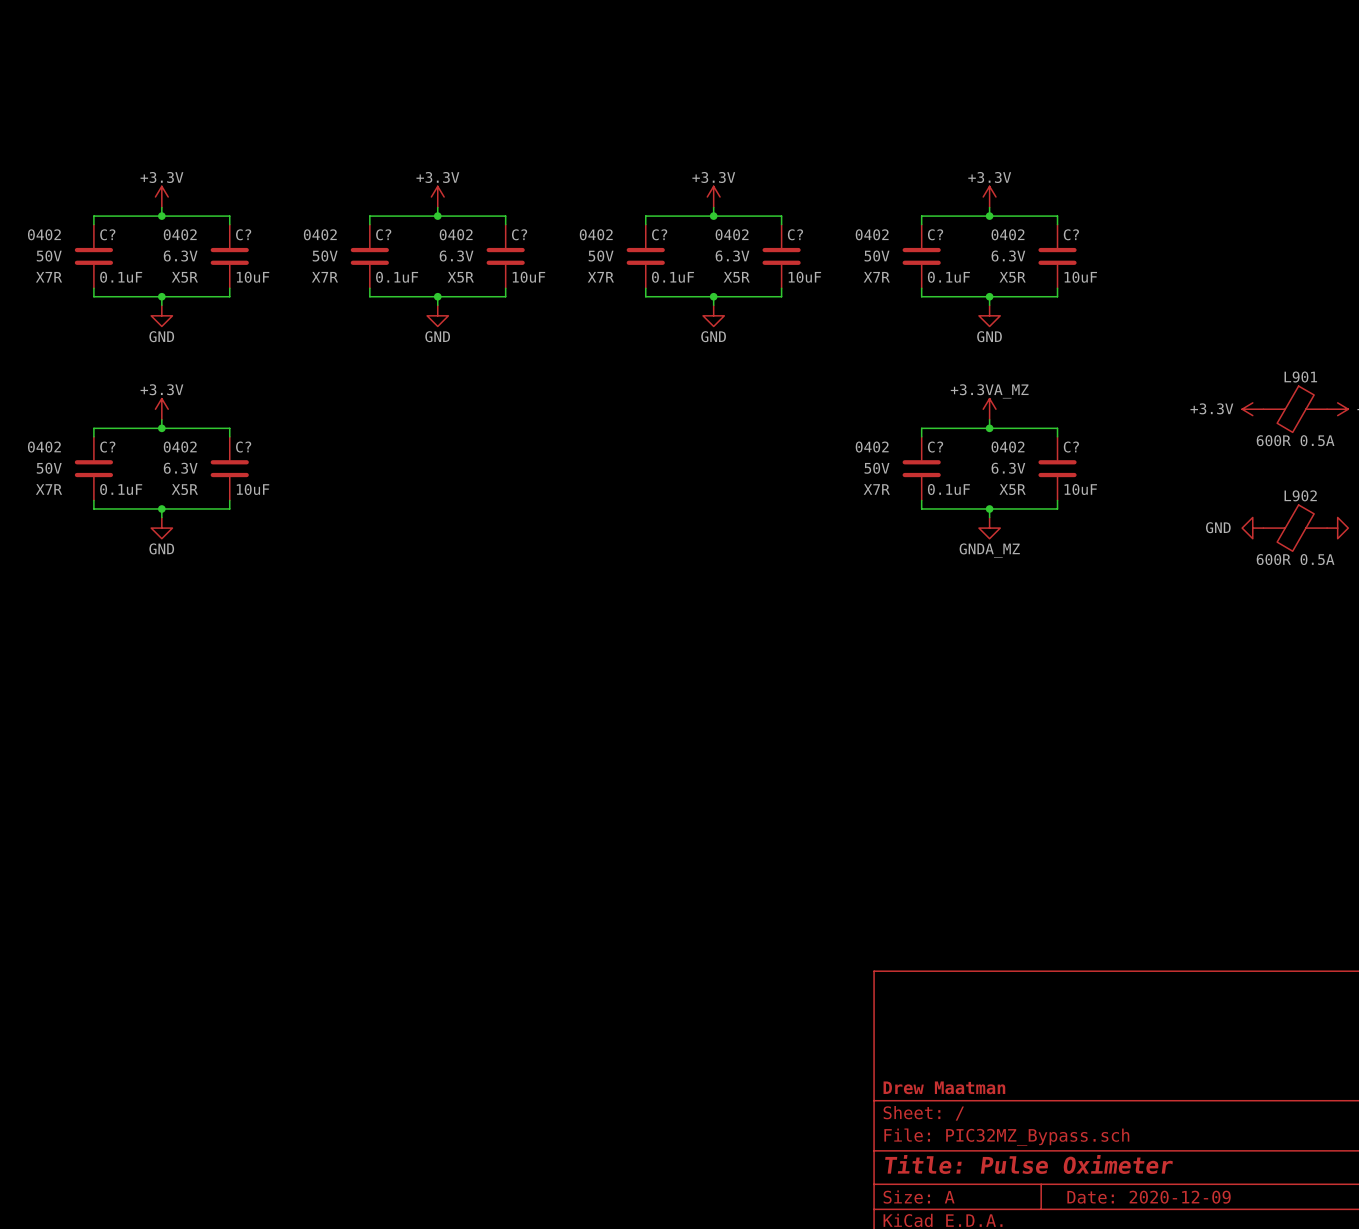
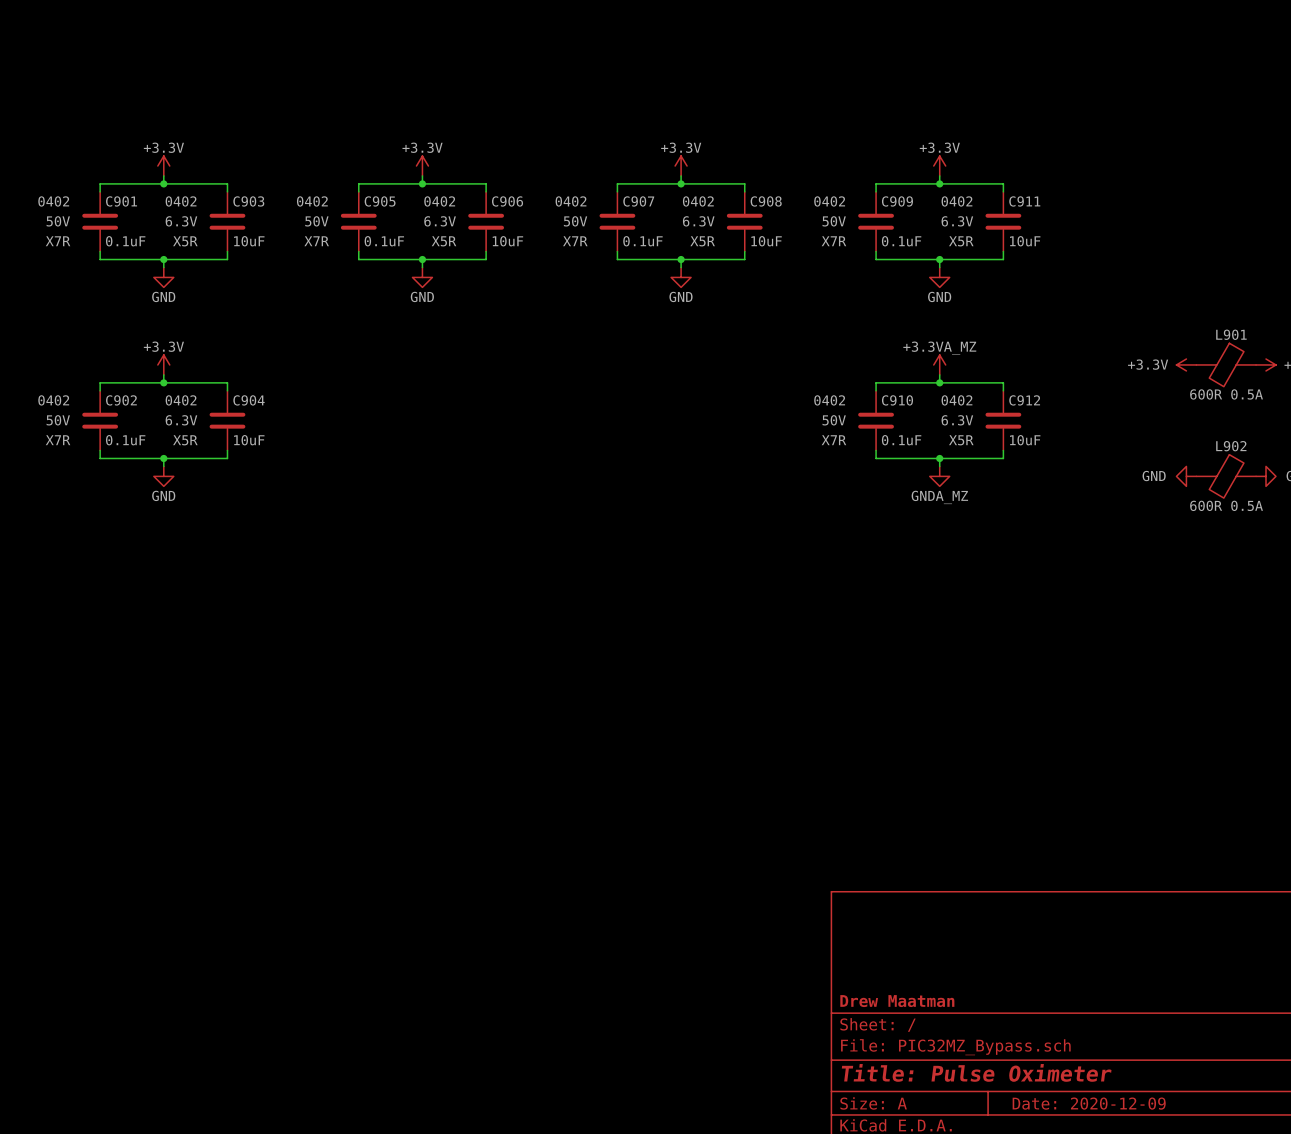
C? name: C? (107, 234) -> C901 (121, 201)
C? name: C? (243, 234) -> C903 (248, 201)
C? name: C? (383, 234) -> C905 (380, 201)
C? name: C? (519, 234) -> C906 (507, 201)
C? name: C? (659, 234) -> C907 (638, 201)
C? name: C? (795, 234) -> C908 (766, 201)
C? name: C? (935, 234) -> C909 (897, 201)
C? name: C? (1071, 234) -> C911 (1024, 201)
C? name: C? (107, 447) -> C902 (121, 400)
C? name: C? (243, 447) -> C904 (249, 400)
C? name: C? (935, 447) -> C910 (897, 400)
C? name: C? (1071, 447) -> C912 (1024, 400)

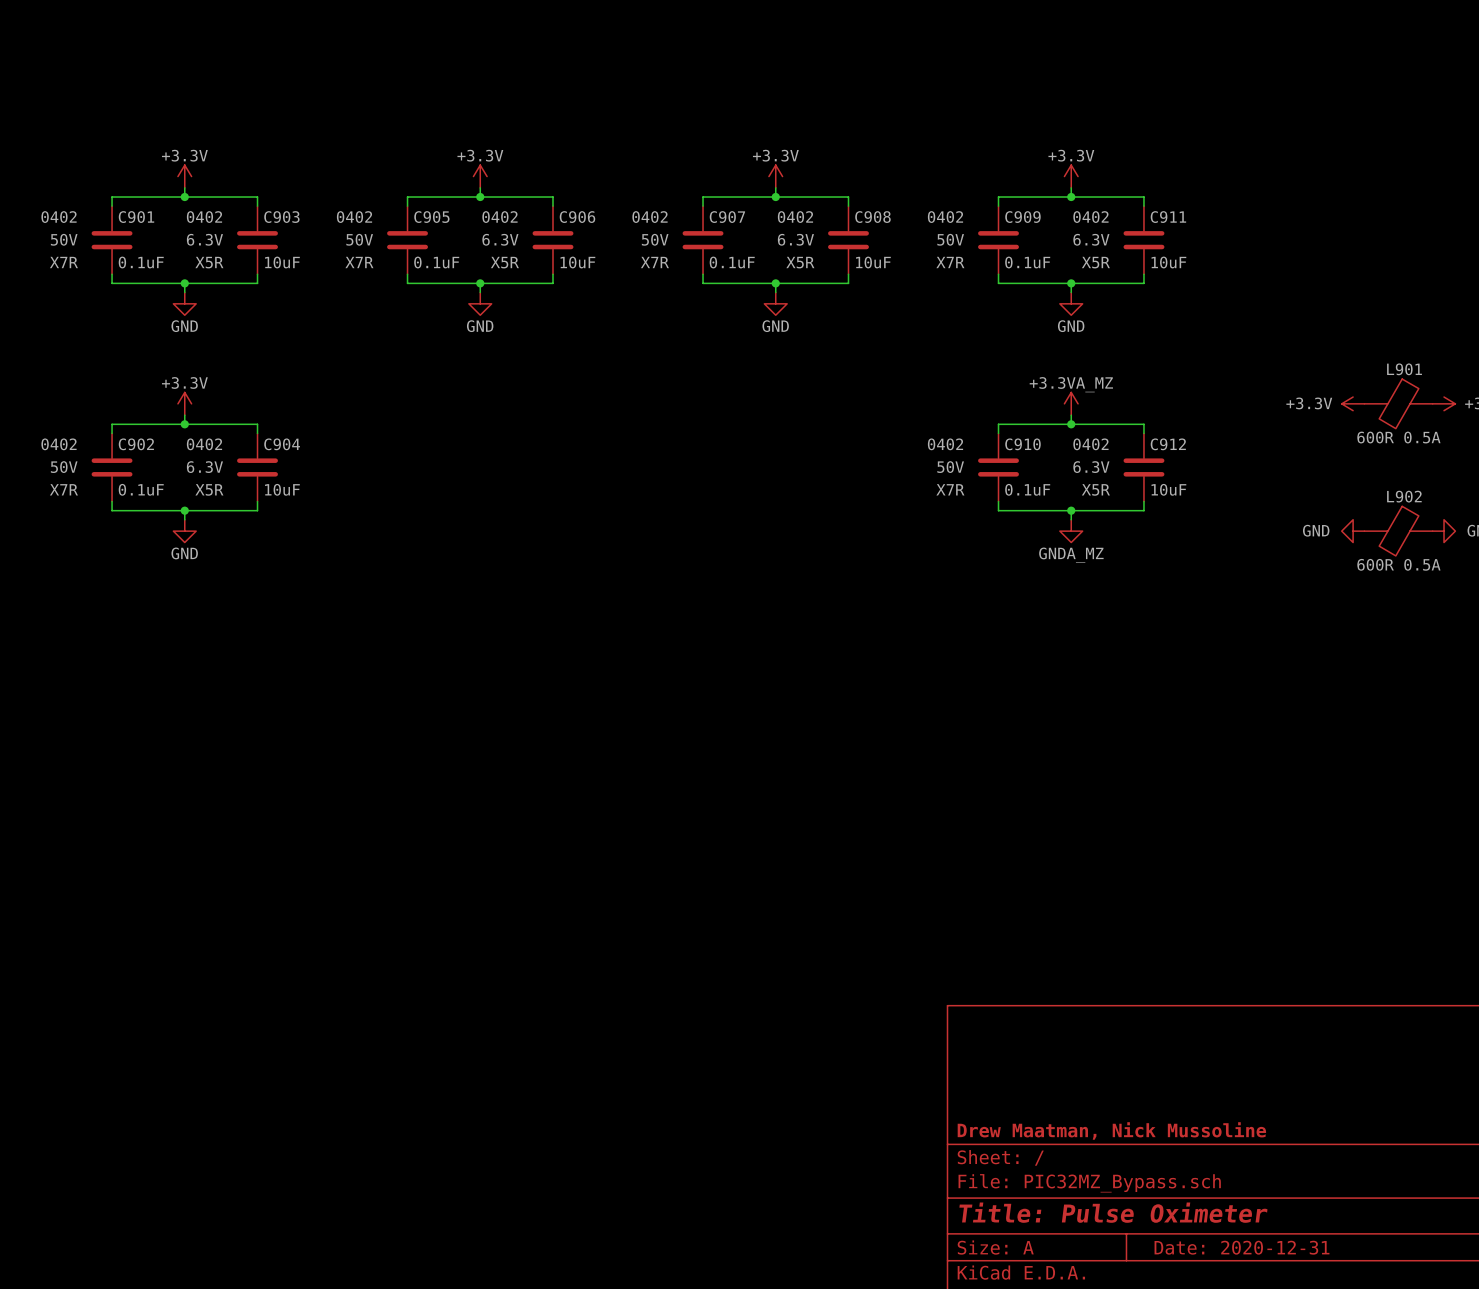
title block: Drew Maatman (897, 1001) -> Drew Maatman, Nick Mussoline (1111, 1130)
title block: Date: 2020-12-09 (1089, 1103) -> Date: 2020-12-31 (1241, 1247)

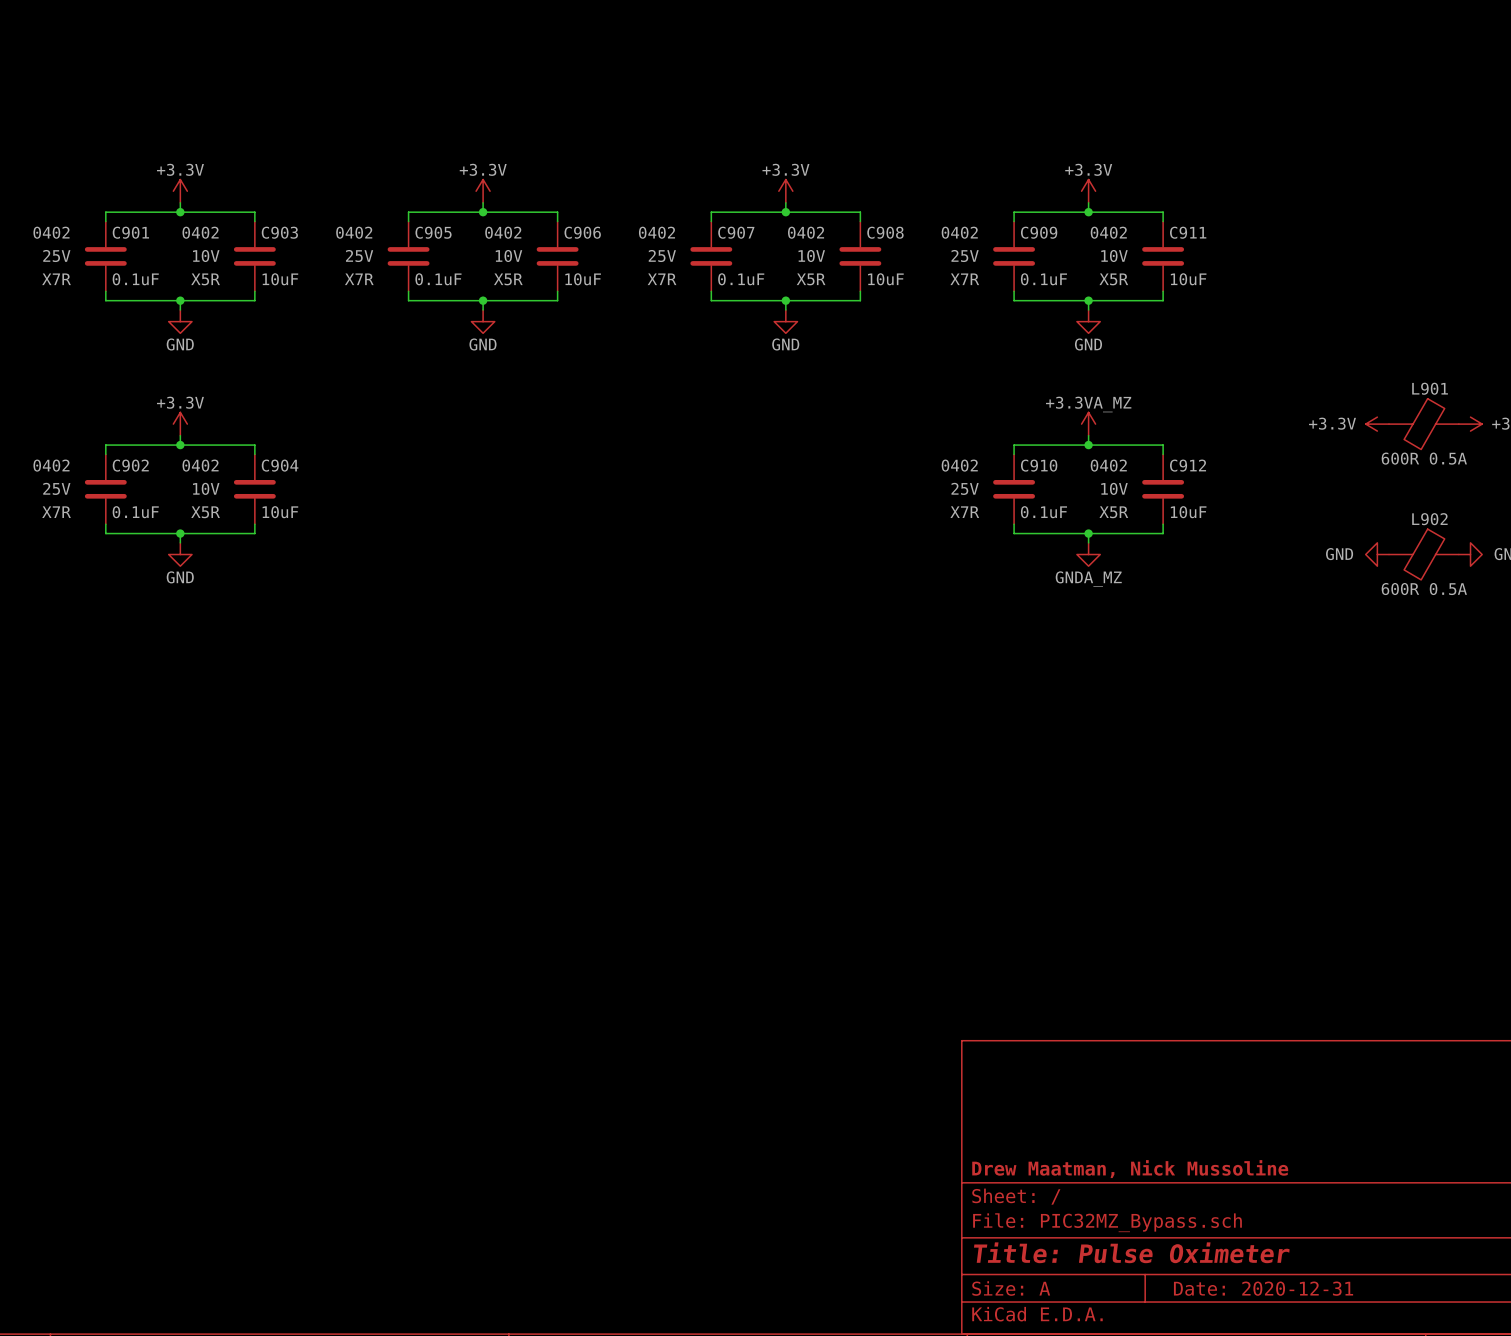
C901 text: 50V (64, 239) -> 25V (56, 256)
C903 text: 6.3V (204, 239) -> 10V (206, 256)
C905 text: 50V (359, 239) -> 25V (359, 256)
C906 text: 6.3V (500, 239) -> 10V (508, 256)
C907 text: 50V (655, 239) -> 25V (662, 256)
C908 text: 6.3V (795, 239) -> 10V (811, 256)
C909 text: 50V (950, 239) -> 25V (965, 256)
C911 text: 6.3V (1091, 239) -> 10V (1114, 256)
C902 text: 50V (64, 467) -> 25V (56, 488)
C904 text: 6.3V (204, 467) -> 10V (206, 488)
C910 text: 50V (950, 467) -> 25V (965, 488)
C912 text: 6.3V (1091, 467) -> 10V (1114, 488)

